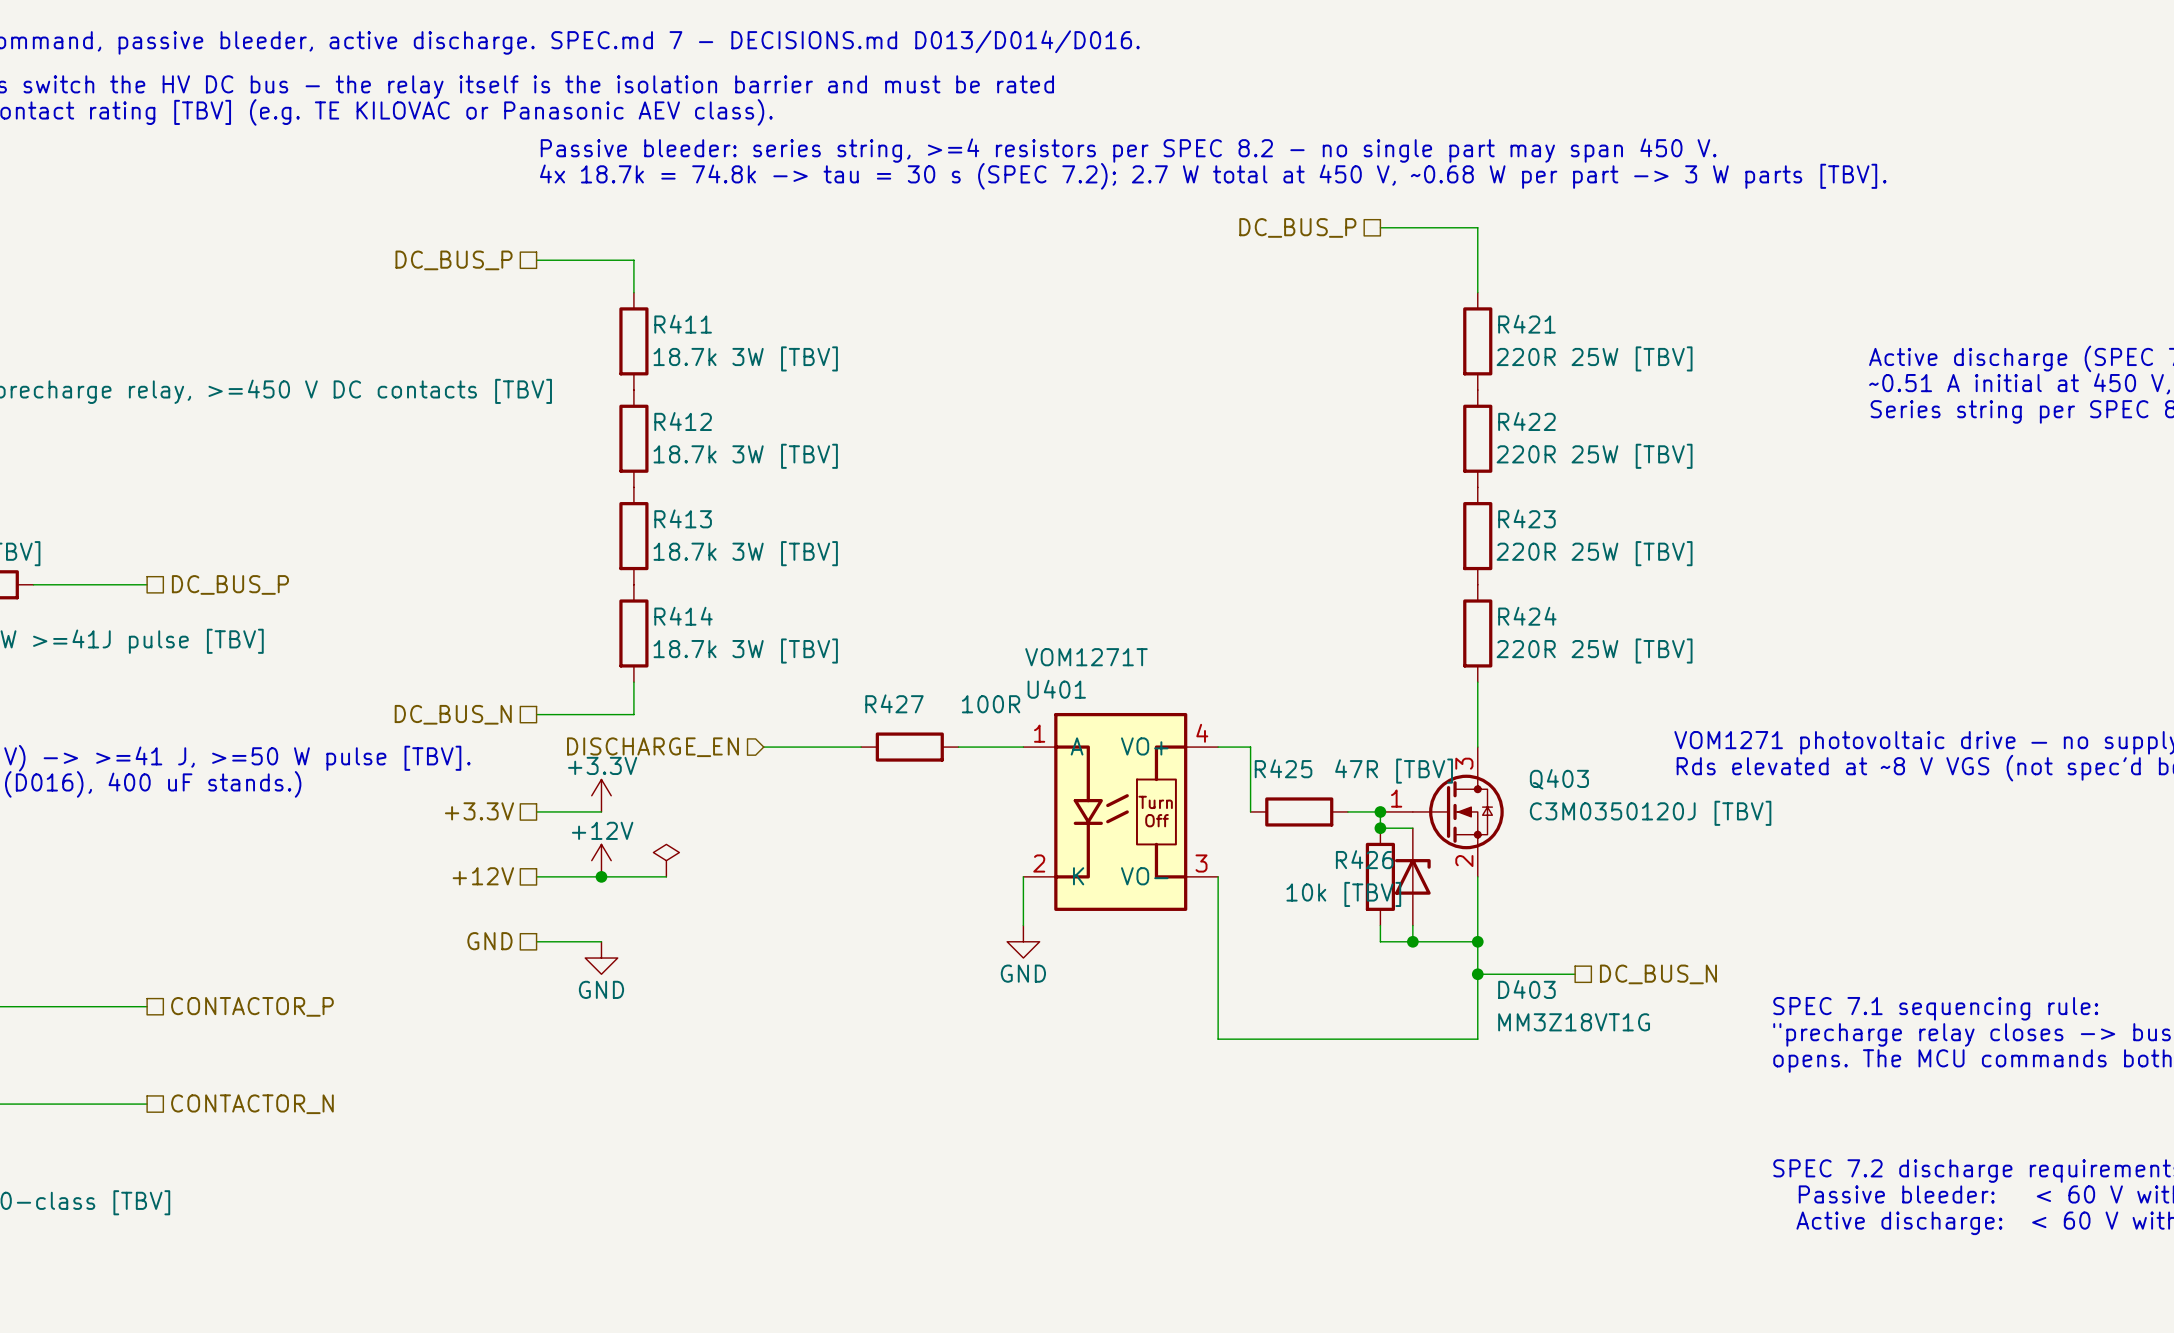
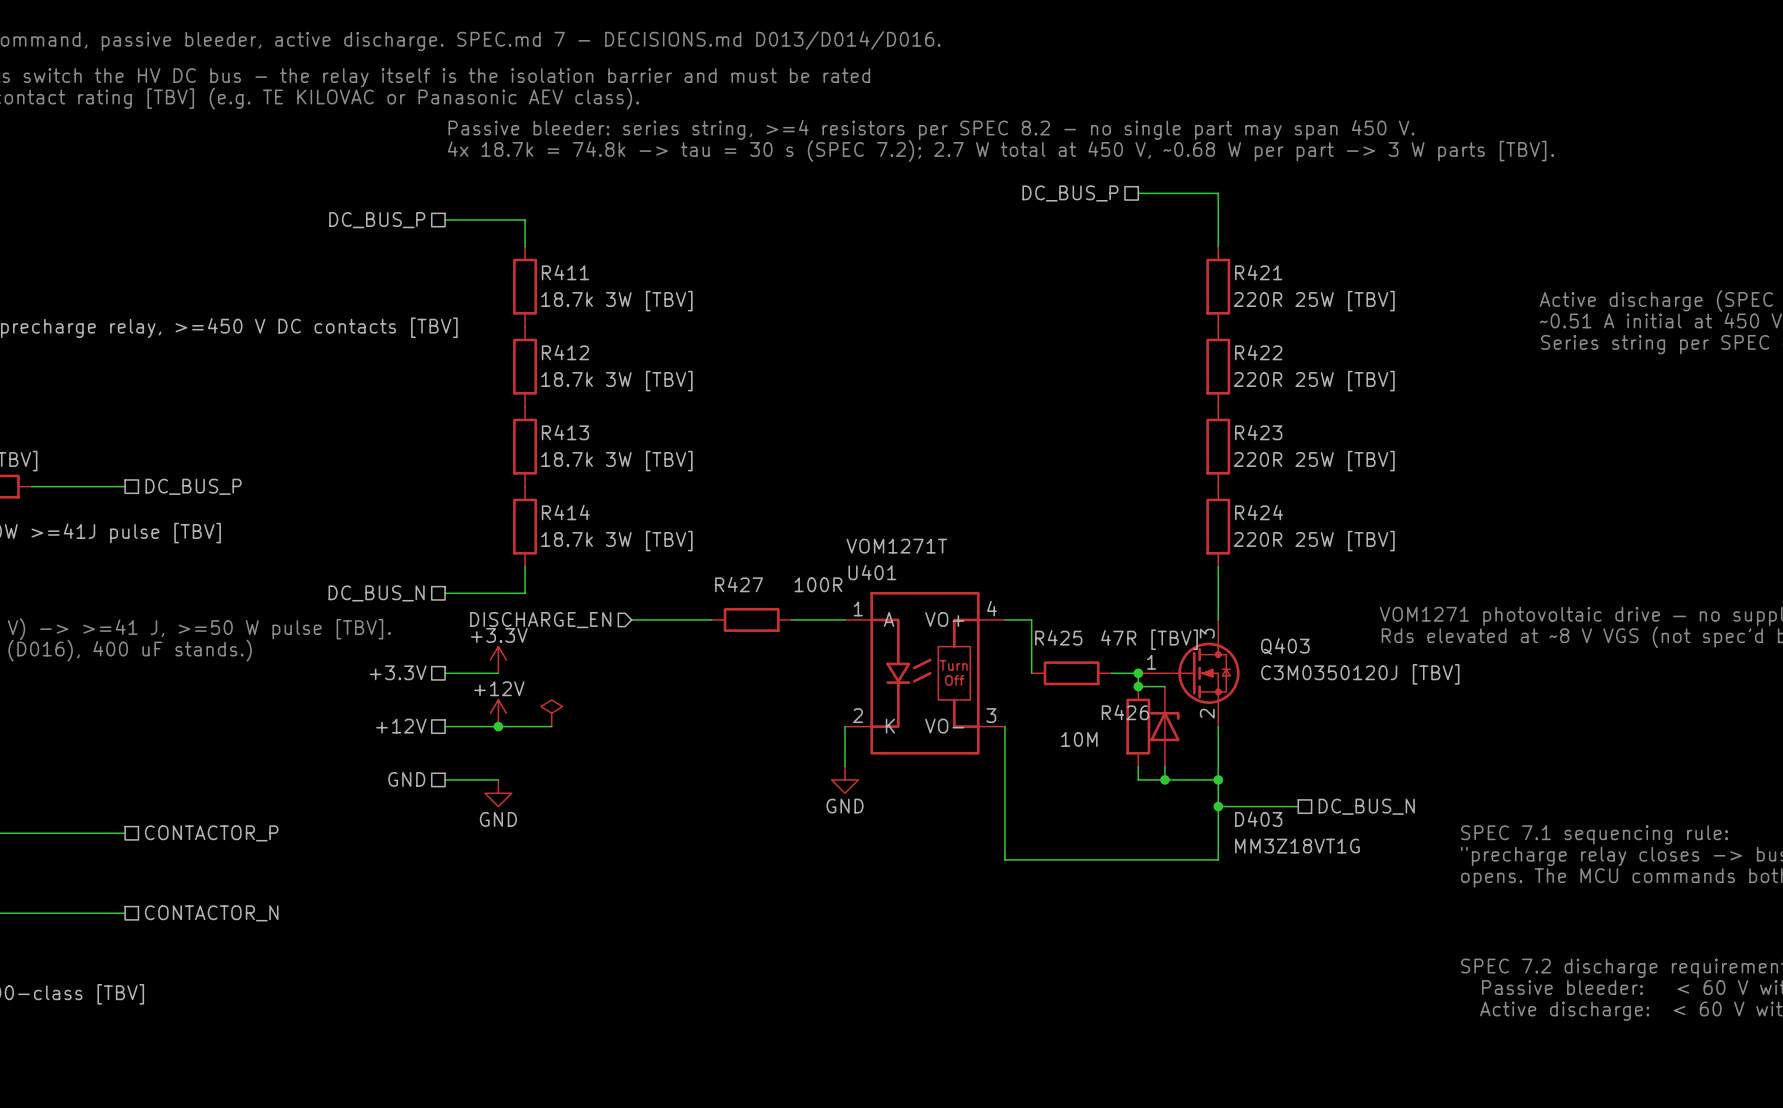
R426 value: 10k [TBV] (1343, 894) -> 10M (1079, 739)

